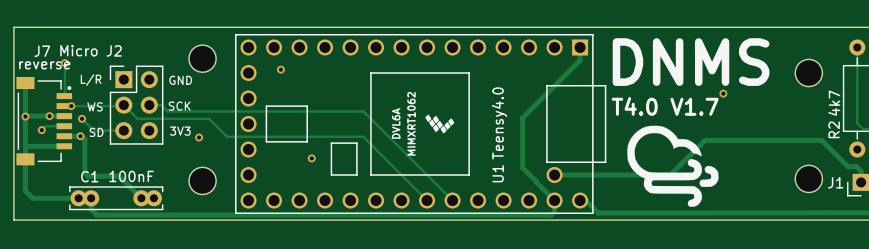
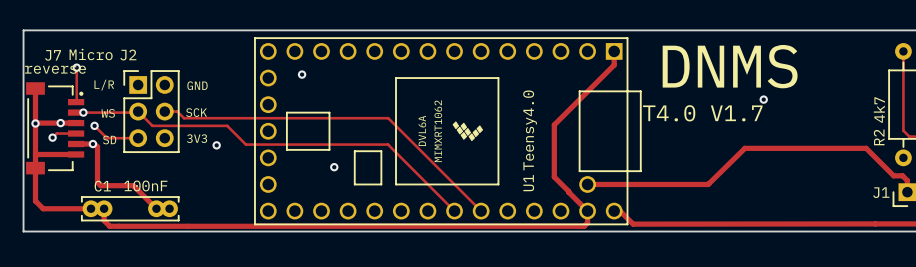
part: (202, 58) -> none
part: (808, 72) -> none
drawing: [627, 125, 719, 207] -> none
part: (808, 178) -> none
part: (202, 180) -> none

